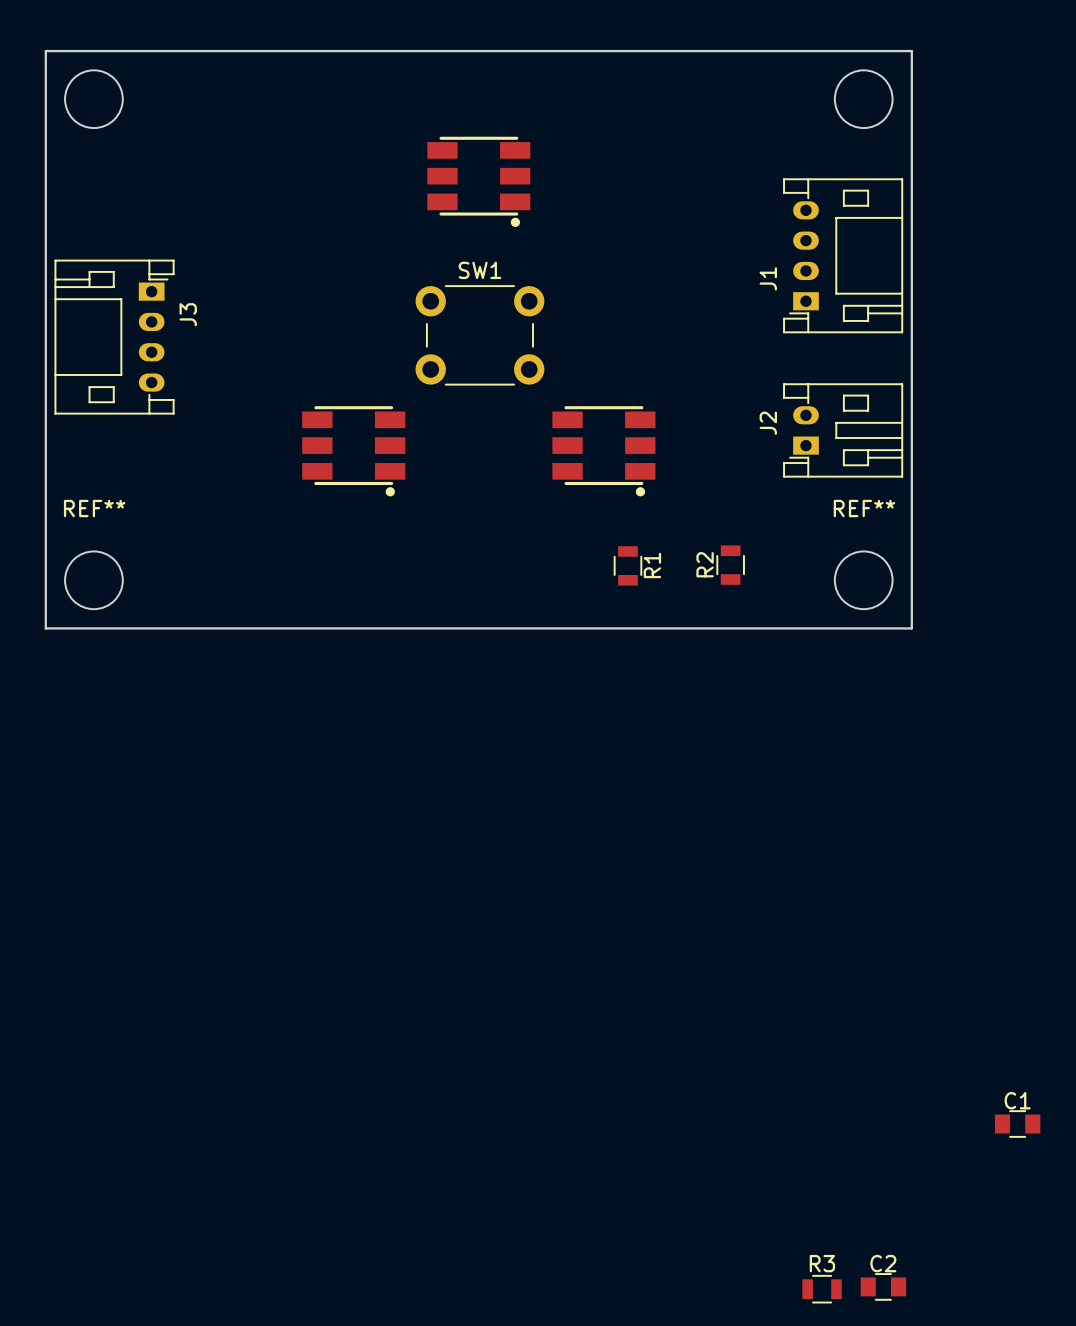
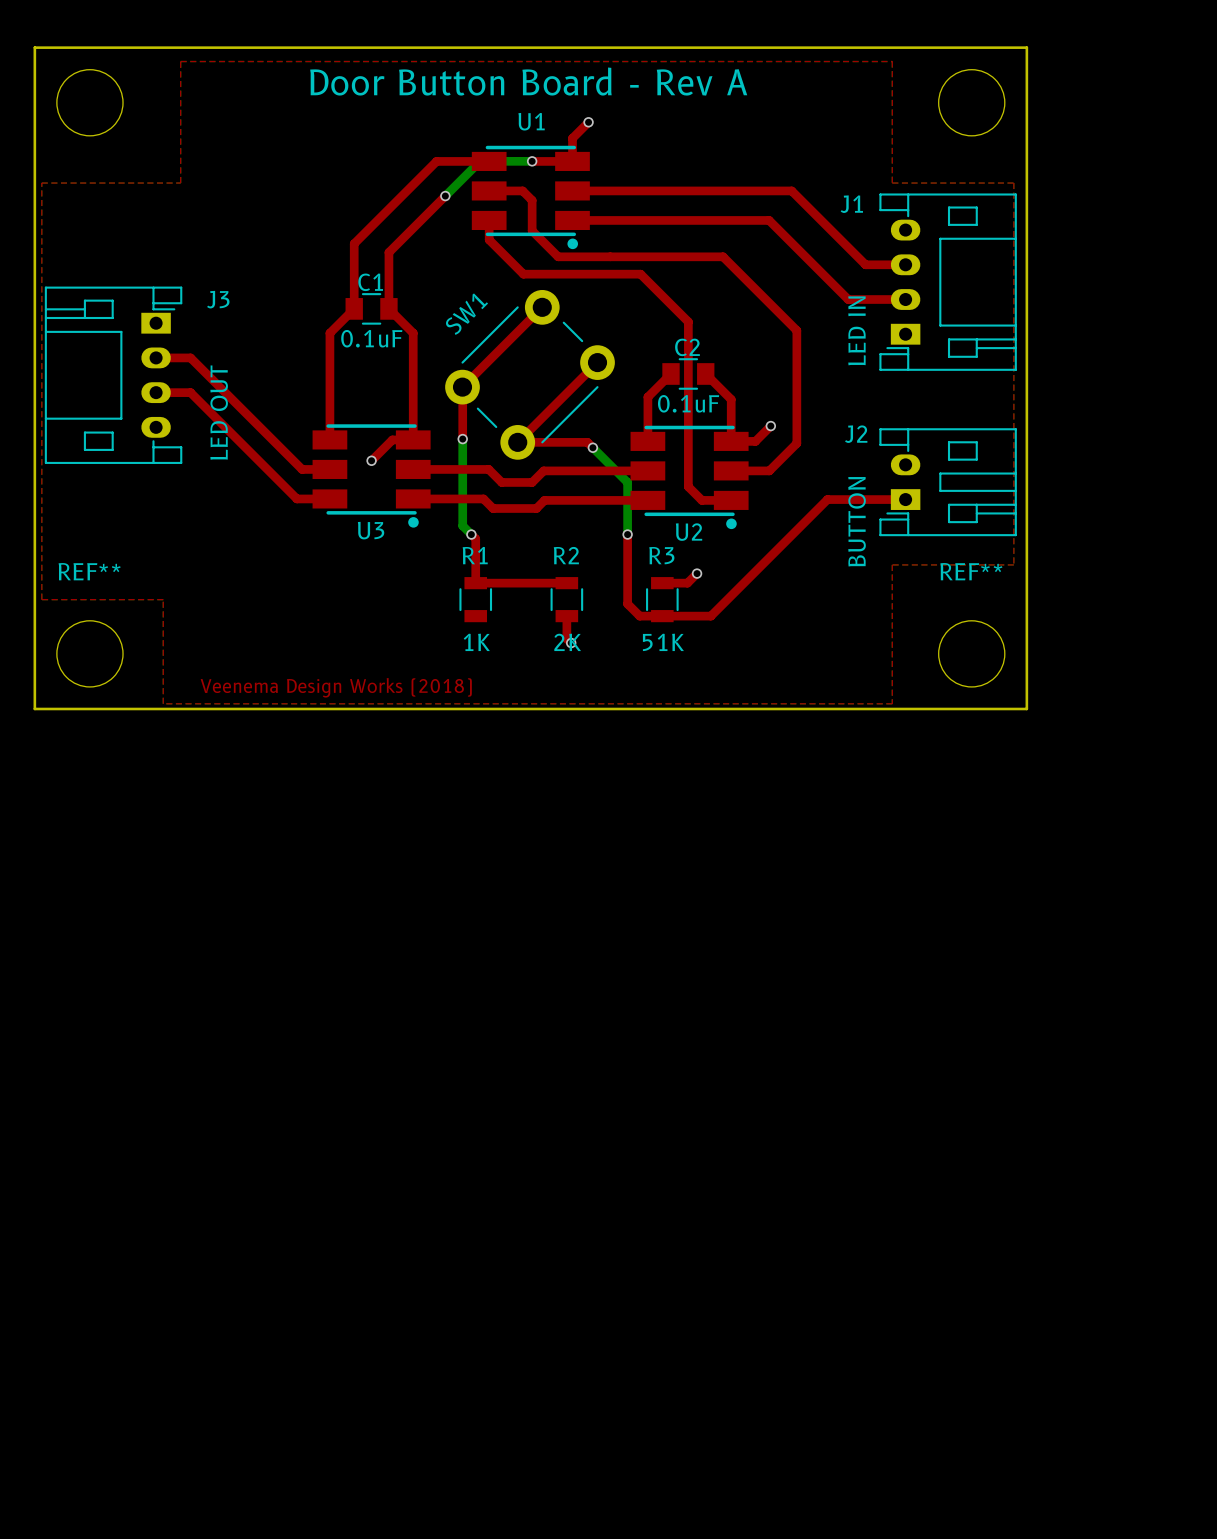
top zone outline: none -> (180, 61) (180, 183) (41, 183) (41, 599) (163, 599) (163, 703) (892, 703) (892, 564) (1013, 564) (1013, 183) (892, 183) (892, 61) (180, 61)
text: none -> Door Button Board - Rev A (528, 81)
U1 name: none -> U1 (531, 121)
top track: none -> (588, 122) (572, 138) (572, 161) (532, 161)
via: none -> (588, 122)
top track: none -> (489, 161) (436, 161) (354, 243) (354, 308) (329, 333) (329, 439)
bottom track: none -> (532, 161) (480, 161) (445, 196)
via: none -> (532, 161)
top track: none -> (489, 190) (522, 190) (532, 200) (532, 230) (558, 256) (723, 256) (796, 330) (796, 443) (769, 470) (731, 470)
top track: none -> (572, 190) (791, 190) (865, 264) (905, 264)
top track: none -> (445, 196) (388, 252) (388, 308) (413, 333) (413, 439) (392, 439) (371, 460)
via: none -> (445, 196)
top track: none -> (489, 220) (489, 239) (523, 274) (640, 274) (688, 321) (688, 486) (701, 500) (731, 500)
top track: none -> (572, 220) (769, 220) (848, 299) (905, 299)
top track: none -> (542, 307) (462, 387)
J1 name rotation: 0° (768, 278) -> 90° clockwise (851, 204)
J1 name position: J1 (768, 278) -> J1 (851, 204)
text: none -> LED IN (856, 330)
C1 value: none -> 0.1uF (371, 338)
J3 name rotation: 0° (188, 314) -> 90° clockwise (218, 299)
J3 name position: J3 (188, 314) -> J3 (218, 299)
top track: none -> (156, 357) (190, 357) (302, 469) (329, 469)
top track: none -> (597, 362) (517, 442) (587, 442) (592, 447)
SW1 rotation: 0° (479, 335) -> 45° counterclockwise (530, 374)
top track: none -> (671, 373) (647, 397) (647, 441)
top track: none -> (705, 373) (731, 399) (731, 441) (755, 441) (770, 426)
top track: none -> (462, 387) (462, 439)
top track: none -> (156, 392) (190, 392) (296, 498) (329, 498)
C2 value: none -> 0.1uF (688, 403)
text: none -> LED OUT (219, 412)
via: none -> (770, 426)
bottom track: none -> (462, 439) (462, 525) (471, 534)
via: none -> (462, 439)
bottom track: none -> (592, 447) (627, 482) (627, 534)
via: none -> (592, 447)
via: none -> (371, 460)
top track: none -> (413, 469) (488, 469) (501, 482) (532, 482) (543, 470) (647, 470)
J2 name rotation: 0° (768, 423) -> 90° clockwise (856, 434)
U3: none -> (371, 475)
U2: none -> (689, 477)
top track: none -> (413, 498) (483, 498) (493, 508) (536, 508) (544, 500) (647, 500)
top track: none -> (904, 498) (827, 499) (710, 616) (639, 616) (627, 603) (627, 534)
part: (353, 451) -> none
part: (603, 451) -> none
text: none -> BUTTON (857, 521)
top track: none -> (471, 534) (475, 538) (475, 583) (566, 583)
via: none -> (471, 534)
via: none -> (627, 534)
top track: none -> (697, 573) (687, 583) (662, 583)
via: none -> (697, 573)
top track: none -> (566, 616) (566, 638) (571, 643)
R2 name rotation: 0° (705, 564) -> 90° clockwise (566, 555)
R2 name position: R2 (705, 564) -> R2 (566, 555)
R1 position: (627, 565) -> (475, 599)
R1 name rotation: 0° (652, 565) -> 90° clockwise (475, 555)
R1 name position: R1 (652, 565) -> R1 (475, 555)
R2 position: (730, 565) -> (566, 599)
R1 value: none -> 1K (476, 642)
R2 value: none -> 2K (567, 642)
via: none -> (571, 643)
R3 value: none -> 51K (663, 642)
text: none -> Veenema Design Works (2018) (336, 687)
C1 position: (1017, 1124) -> (371, 308)
C2 position: (883, 1286) -> (688, 373)
R3 rotation: 0° (822, 1289) -> 90° clockwise (662, 599)
R3 position: (822, 1289) -> (662, 599)

